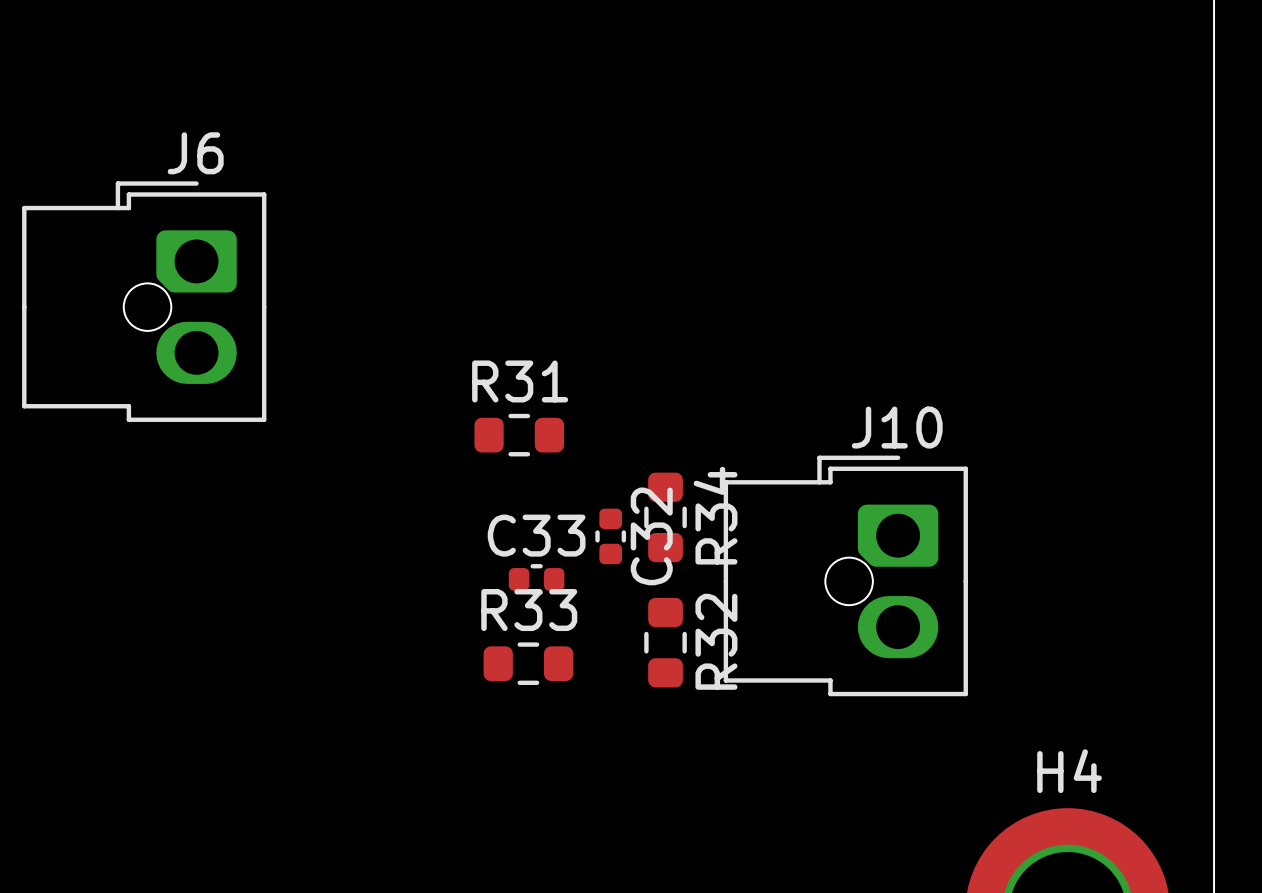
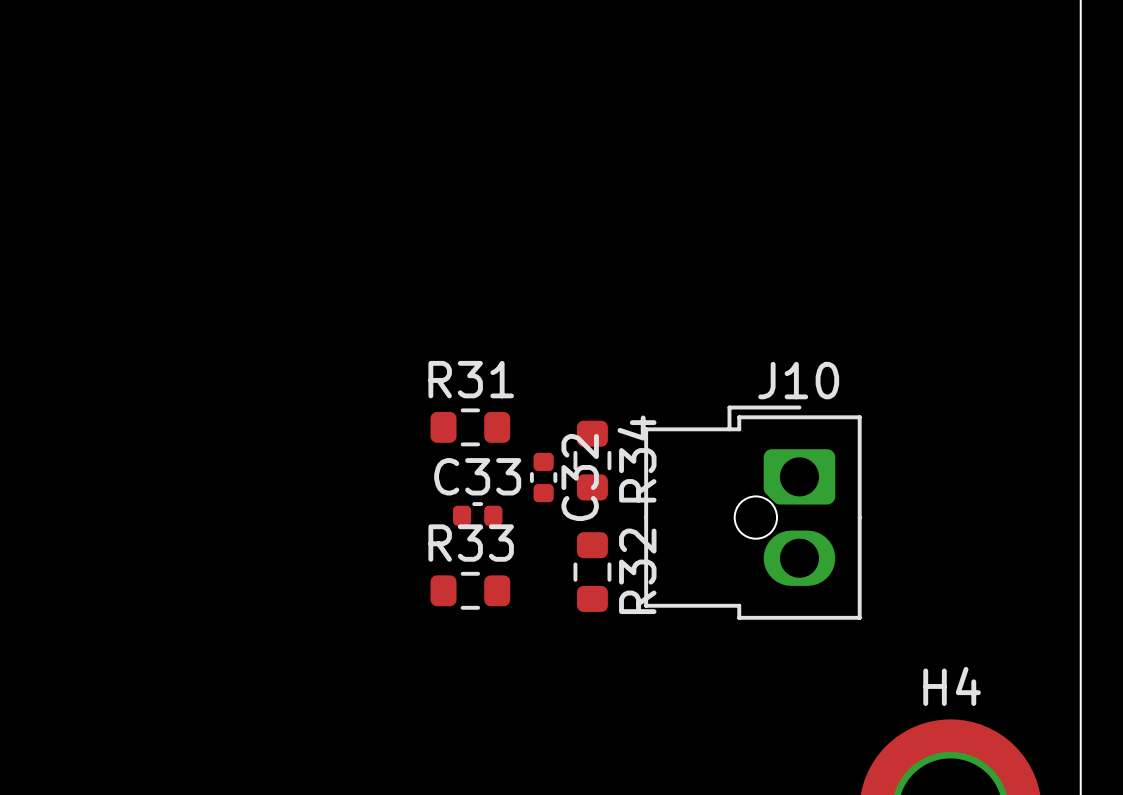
J6: (144, 301) -> none
R31 position: (519, 435) -> (470, 427)

